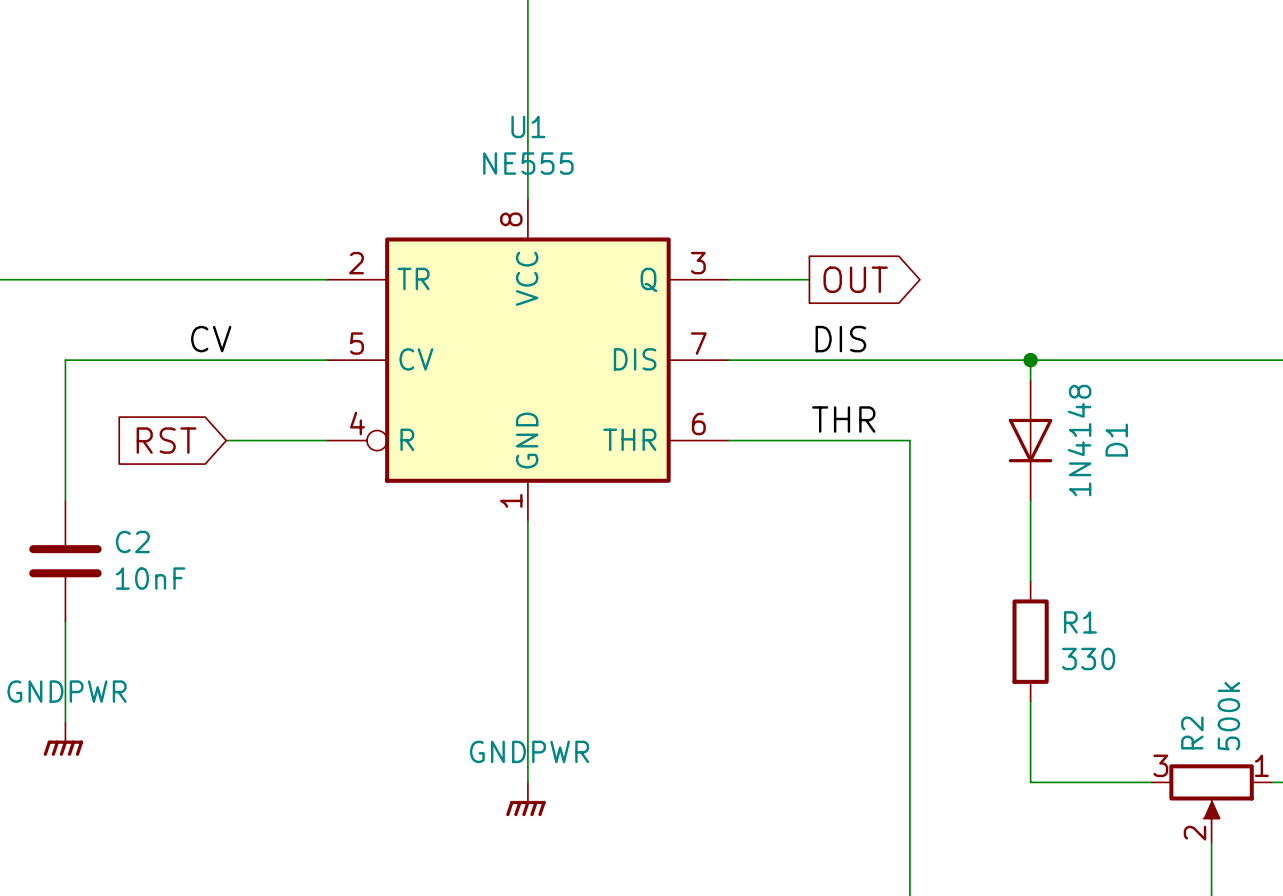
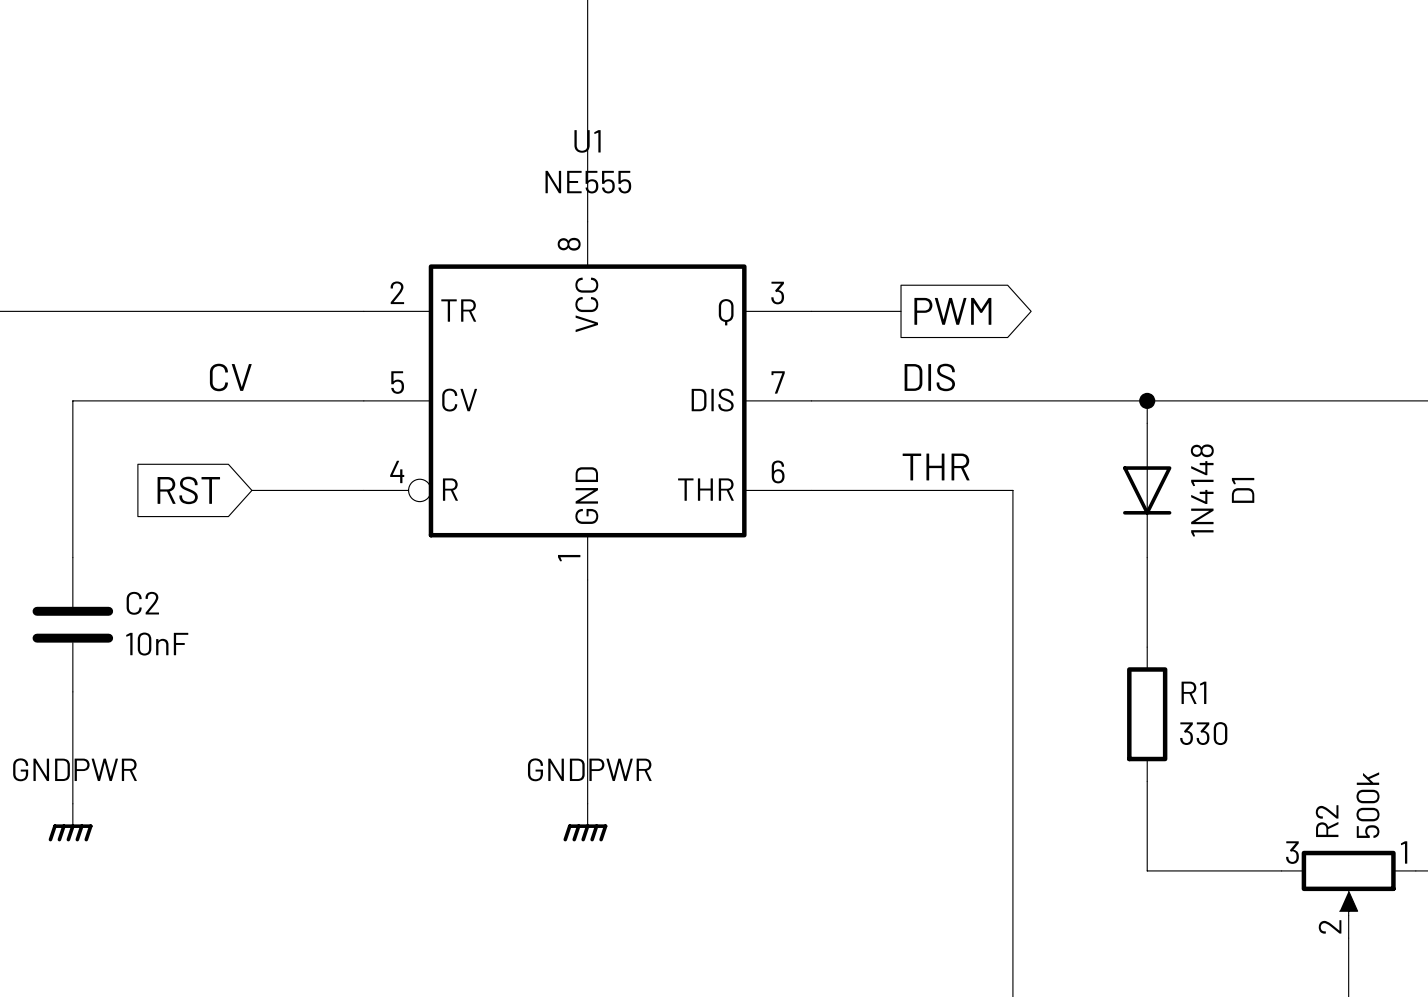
global label: OUT (855, 279) -> PWM (952, 311)
wire: (527, 722) (527, 782) -> none
power symbol position: GNDPWR (525, 799) -> GNDPWR (585, 822)

